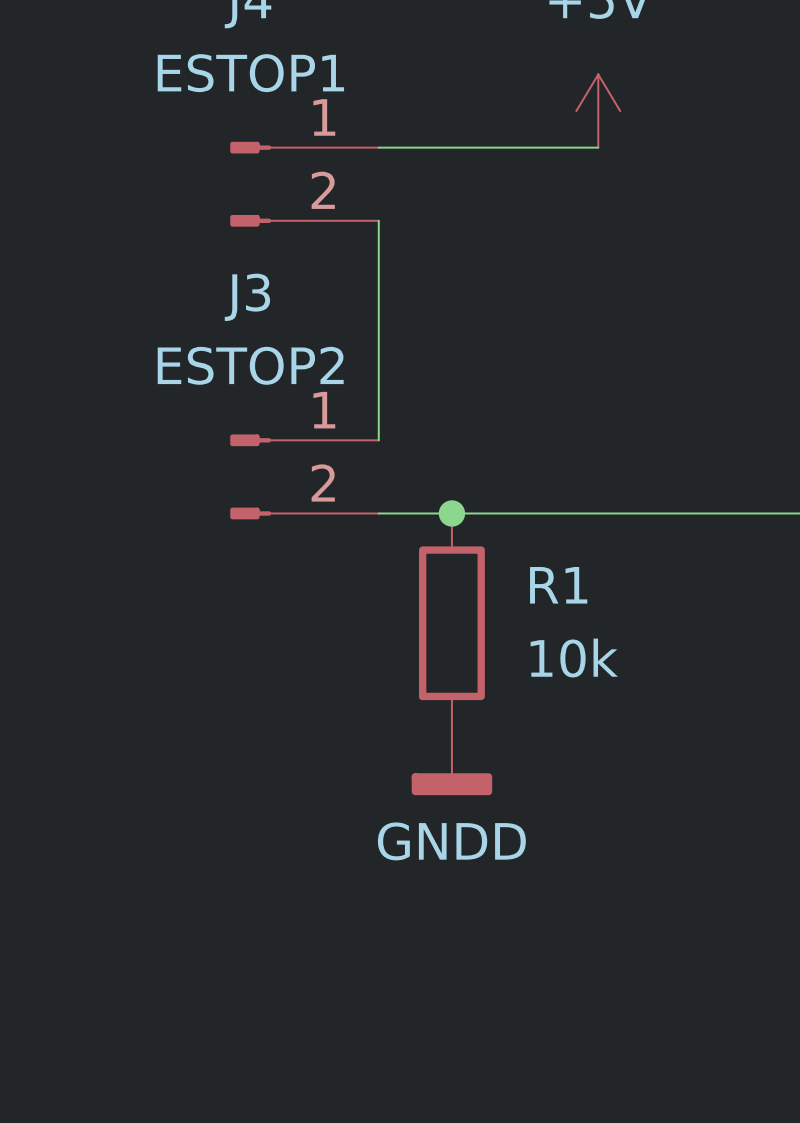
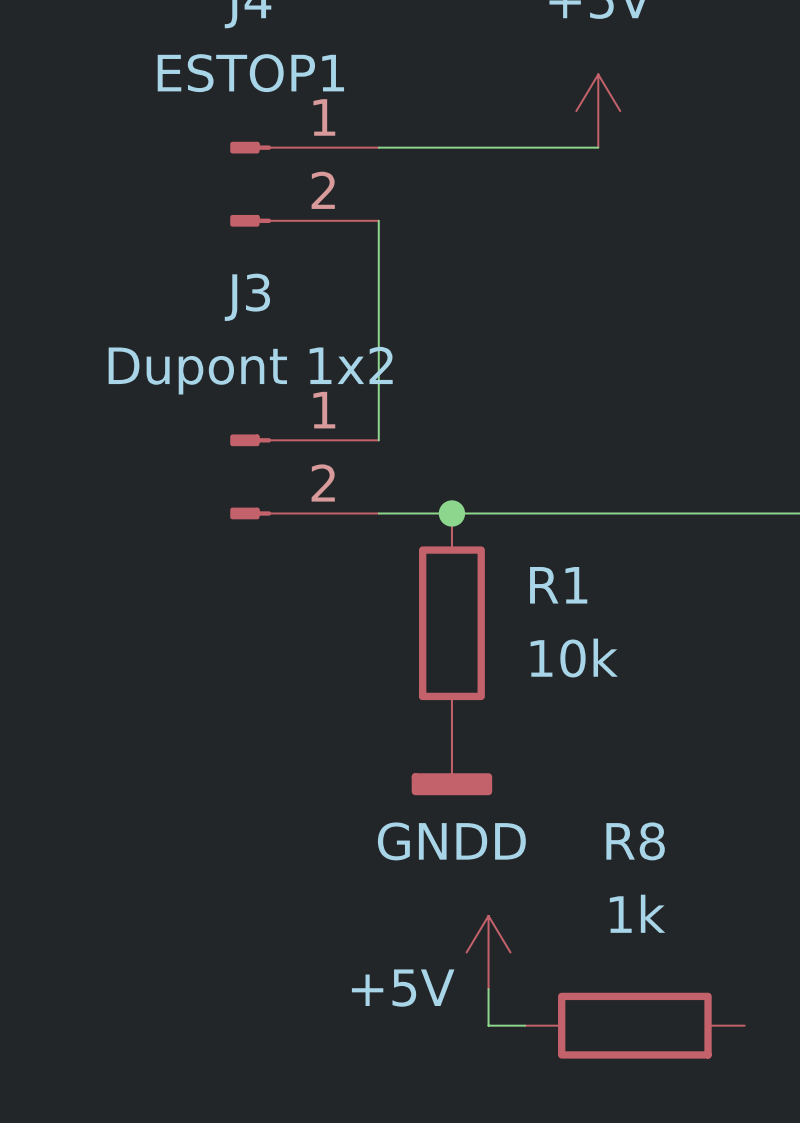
J3 value: ESTOP2 (250, 365) -> Dupont 1x2 (250, 370)
power symbol: none -> +5V (488, 952)
wire: none -> (488, 989) (488, 1025) (525, 1025)
R8: none -> 1k (634, 1025)

